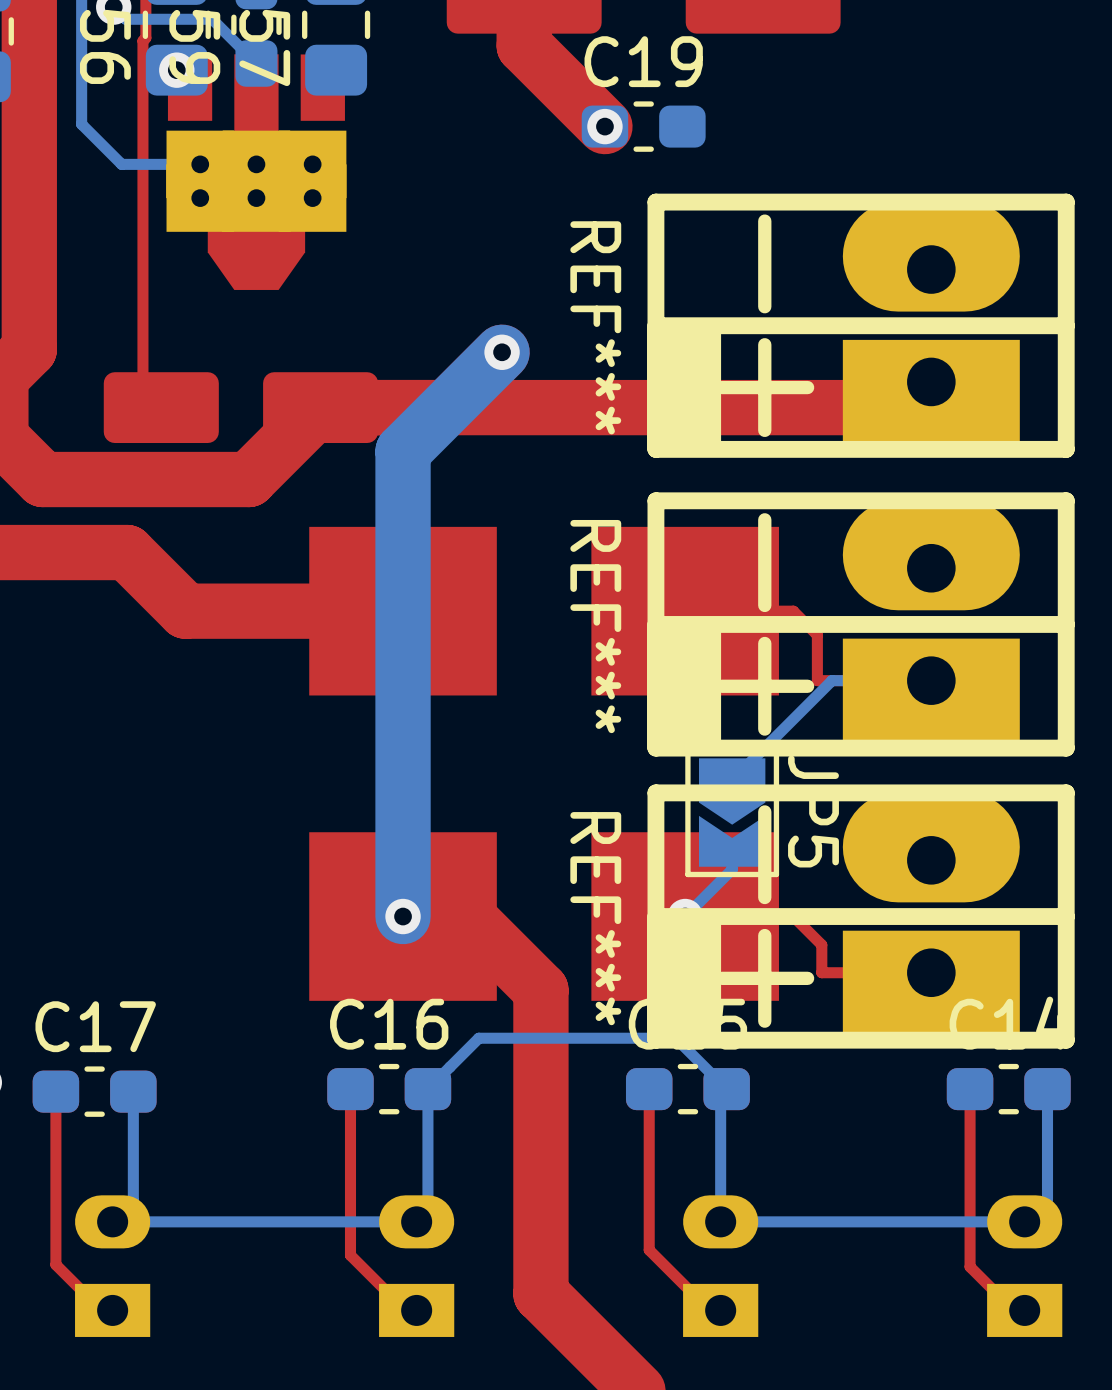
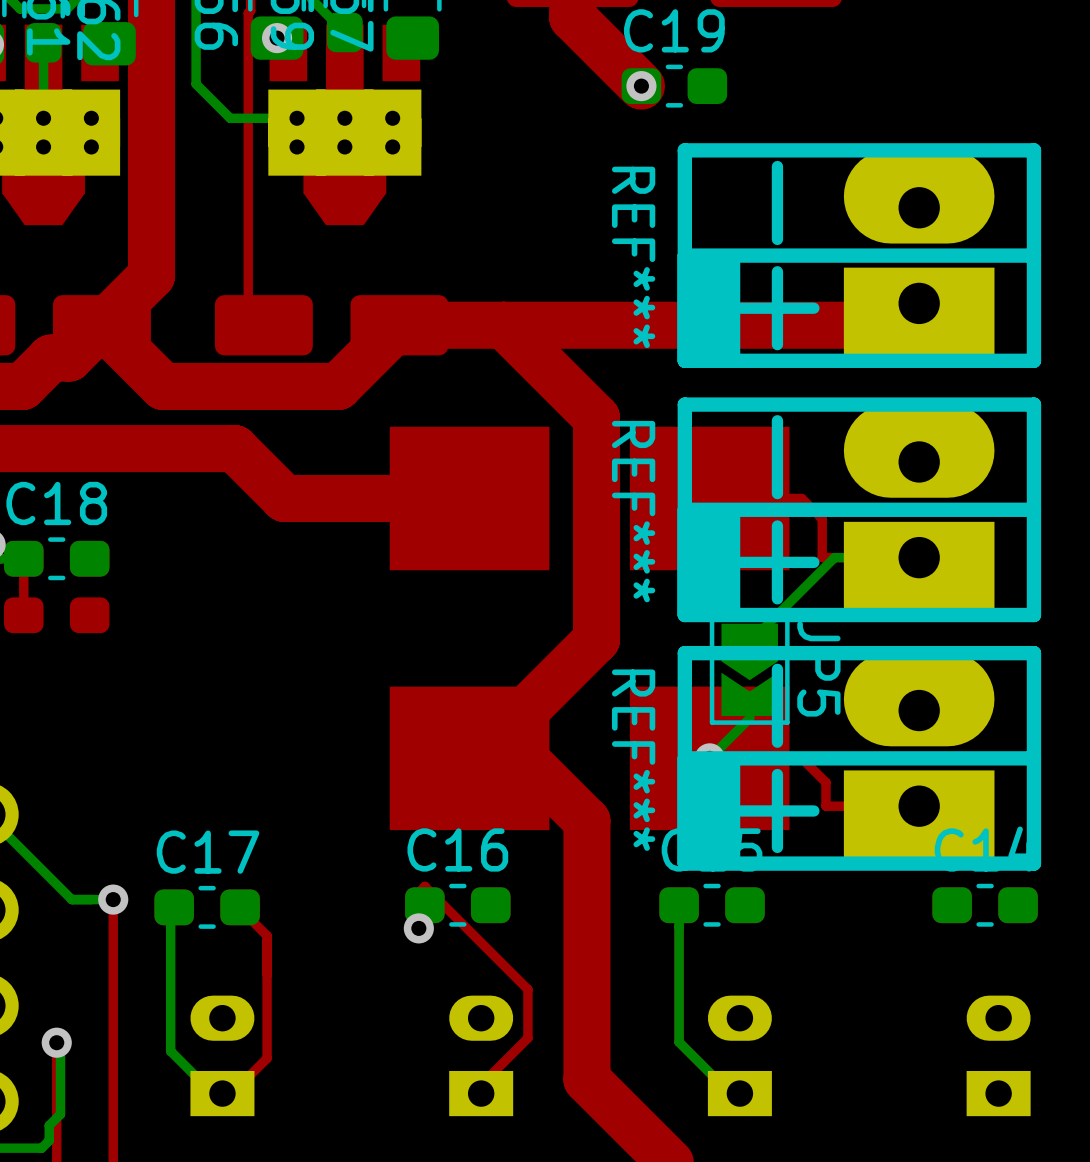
bottom track: (502, 352) (403, 451) (403, 916) -> none
via: (502, 352) -> none
top track: none -> (503, 325) (596, 417) (596, 639) (500, 735)
via position: (403, 916) -> (418, 928)
bottom track: none -> (170, 905) (170, 1051) (213, 1093)
top track: (350, 1089) (350, 1255) (405, 1310) (416, 1310) -> none
bottom track: none -> (679, 905) (679, 1042) (730, 1093)
top track: (970, 1089) (970, 1266) (1013, 1310) (1024, 1310) -> none
bottom track: (1047, 1089) (1047, 1199) (1024, 1221) (720, 1221) (720, 1095) (726, 1089) (675, 1038) (478, 1038) (427, 1089) (427, 1210) (416, 1221) (112, 1221) (133, 1201) (133, 1091) -> none
top track: (55, 1091) (55, 1264) (101, 1310) (112, 1310) -> (236, 905) (267, 935) (267, 1058) (231, 1093) (222, 1093)
top track: none -> (418, 928) (418, 892) (424, 886) (527, 989) (527, 1038) (481, 1084)

